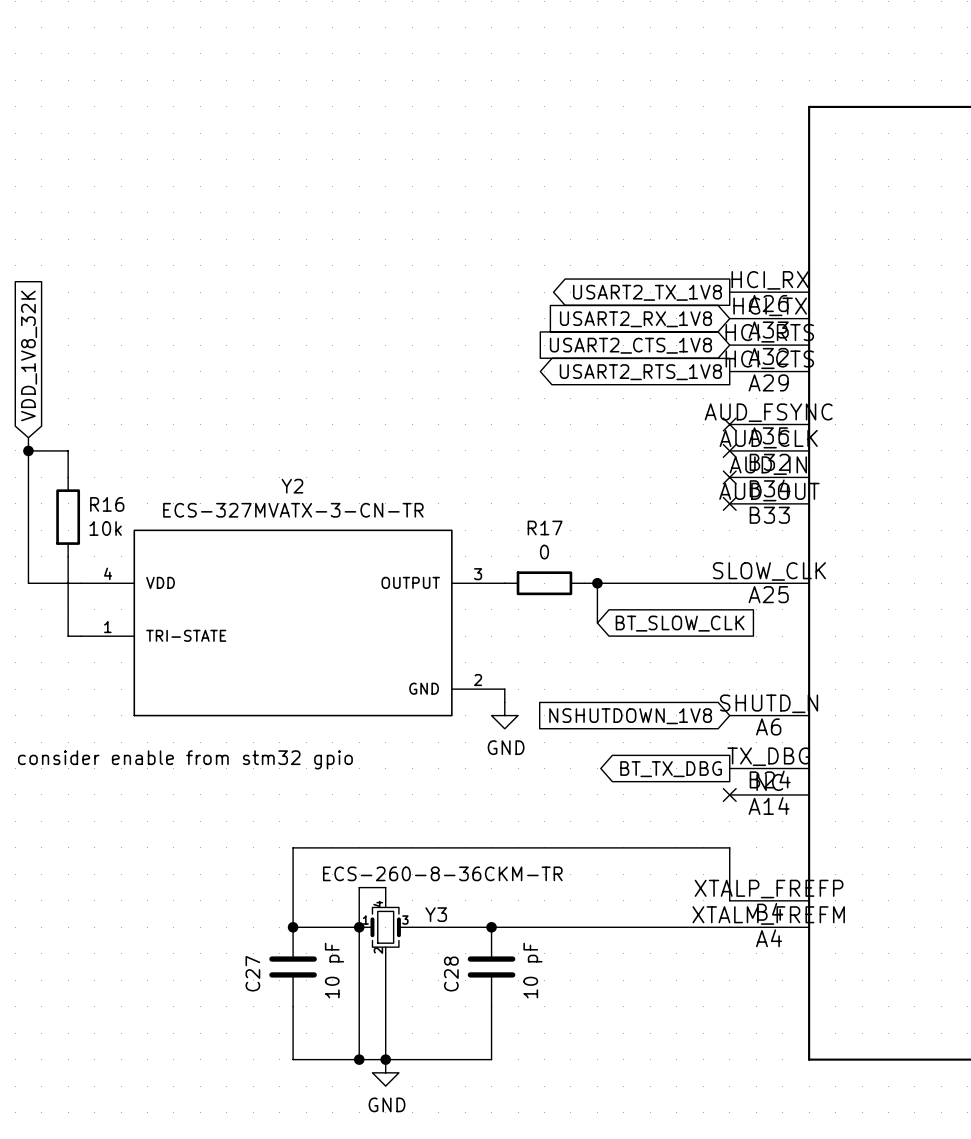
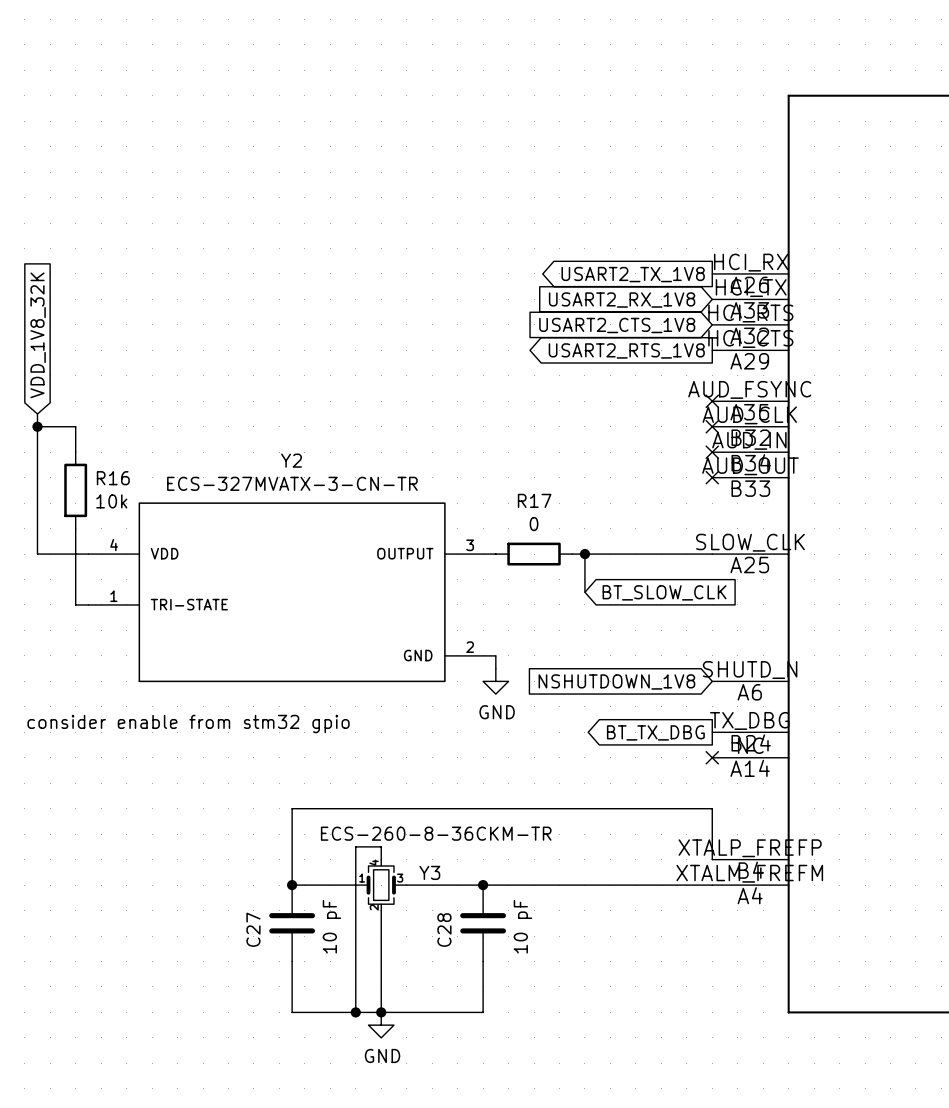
junction: (359, 927) -> none

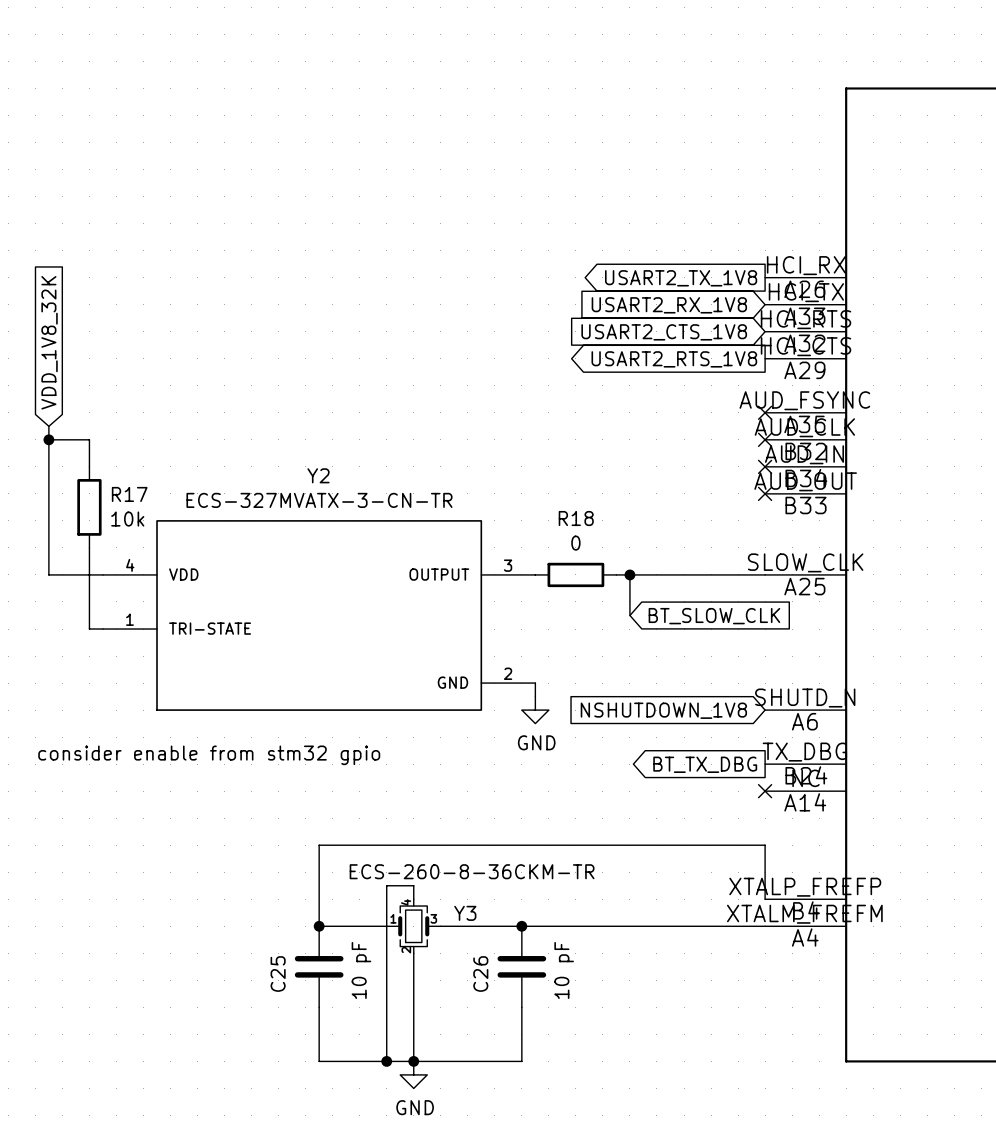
R16 name: R16 (113, 478) -> R17 (129, 494)
R17 name: R17 (534, 500) -> R18 (576, 518)
C27 name: C27 (253, 929) -> C25 (278, 974)
C28 name: C28 (444, 930) -> C26 (480, 974)

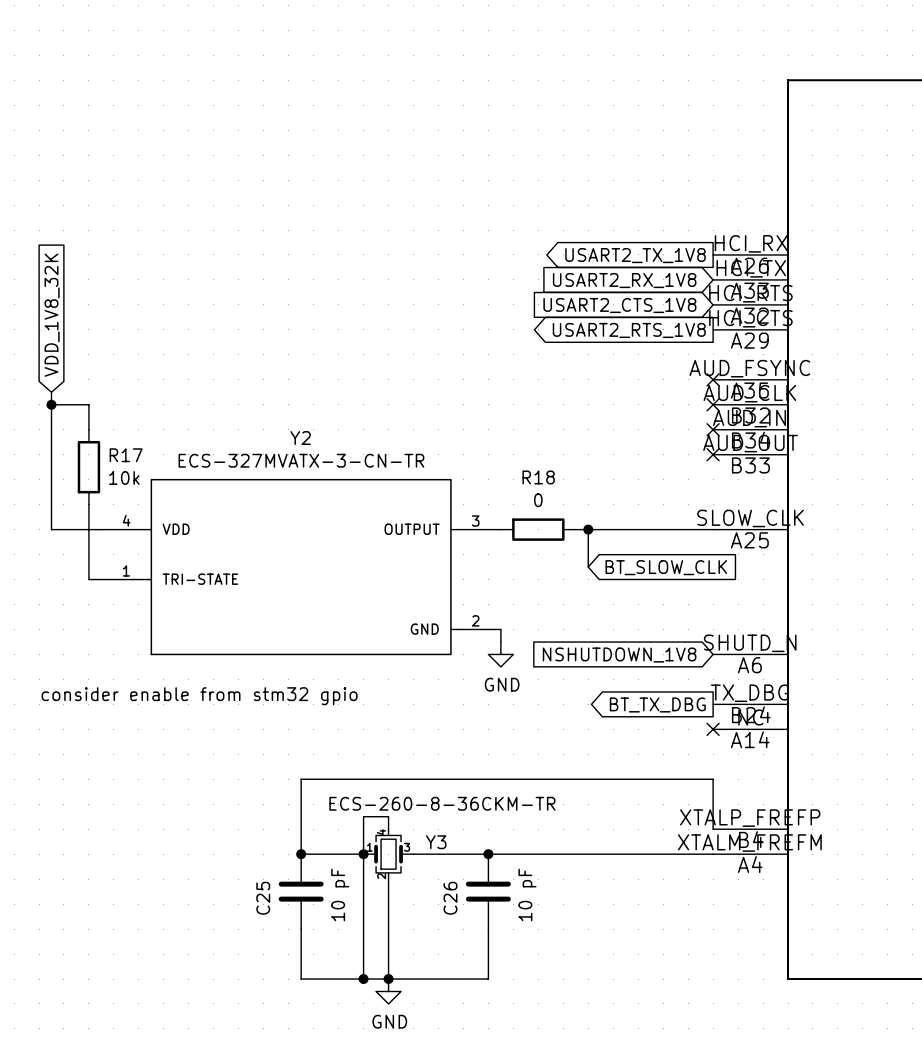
junction: none -> (363, 854)

